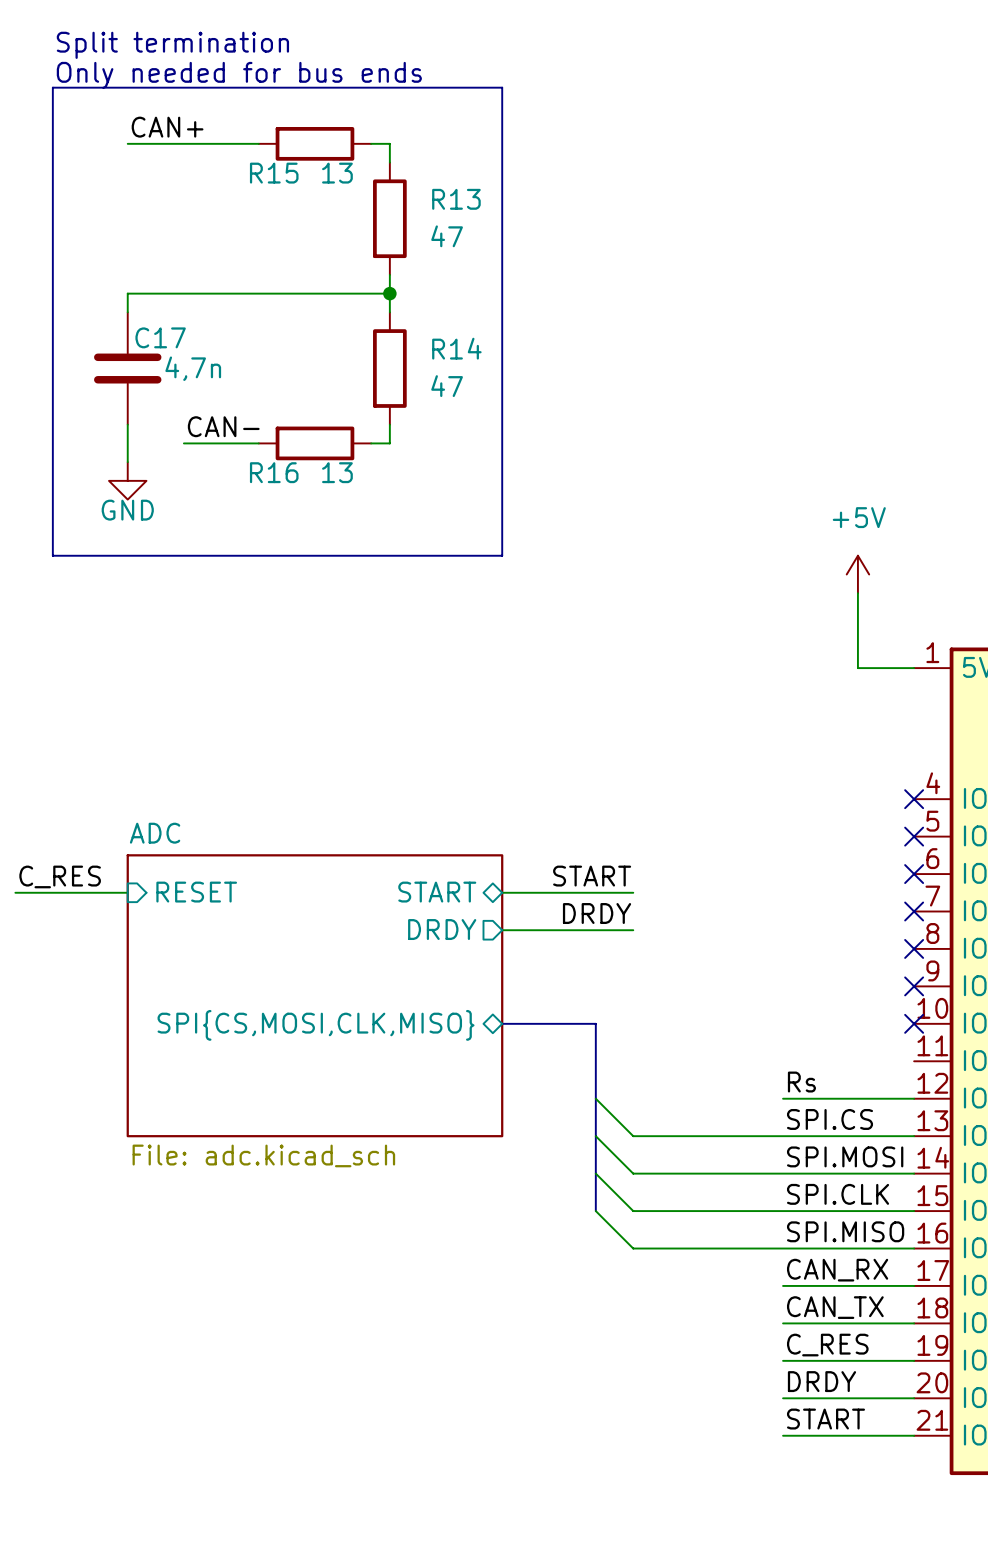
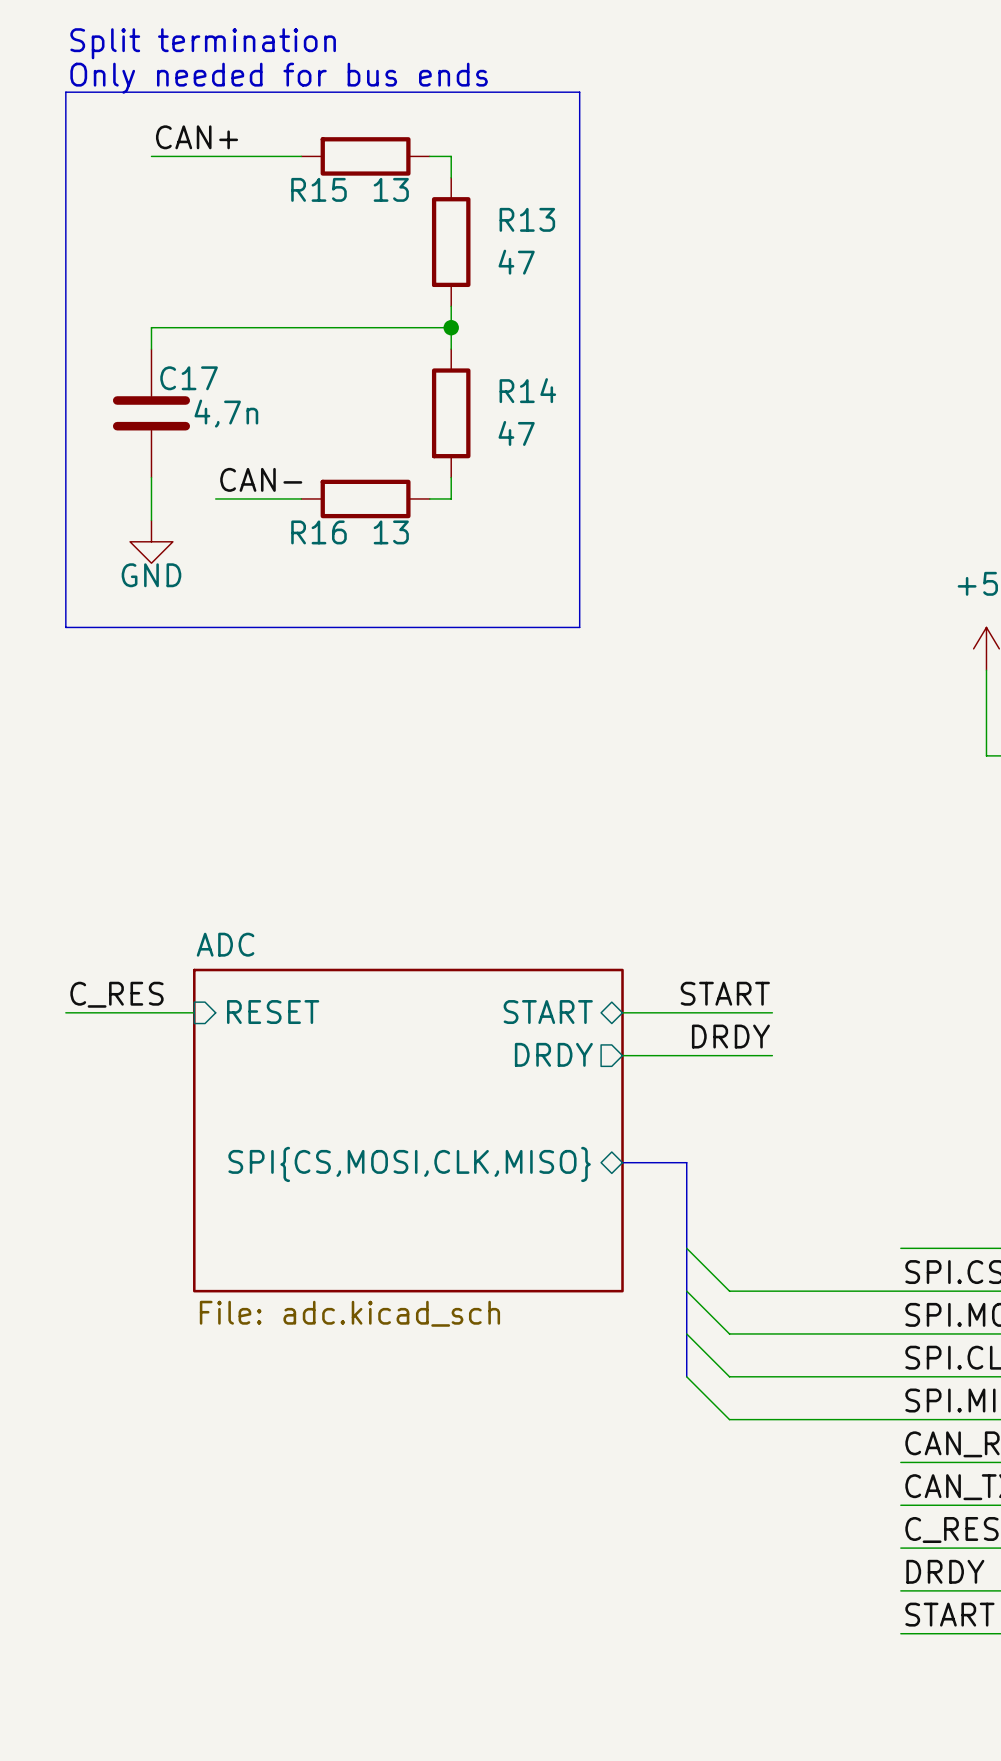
label position: C_RES (60, 876) -> C_RES (116, 994)
label position: START (592, 876) -> START (725, 993)
wire: (15, 892) (52, 892) -> (151, 1012) (194, 1012)
sheet pin position: RESET (196, 892) -> RESET (273, 1012)
sheet pin position: START (437, 892) -> START (548, 1012)
wire: (502, 892) (539, 892) -> (729, 1012) (772, 1012)
label position: DRDY (597, 913) -> DRDY (730, 1036)
sheet pin position: DRDY (442, 929) -> DRDY (553, 1054)
wire: (502, 930) (539, 930) -> (729, 1055) (772, 1055)
sheet ADC position: (314, 995) -> (408, 1130)
bus: (502, 1023) (539, 1023) -> none
sheet pin position: SPI{CS,MOSI,CLK,MISO} (316, 1025) -> SPI{CS,MOSI,CLK,MISO} (409, 1164)
label: Rs (801, 1082) -> none

